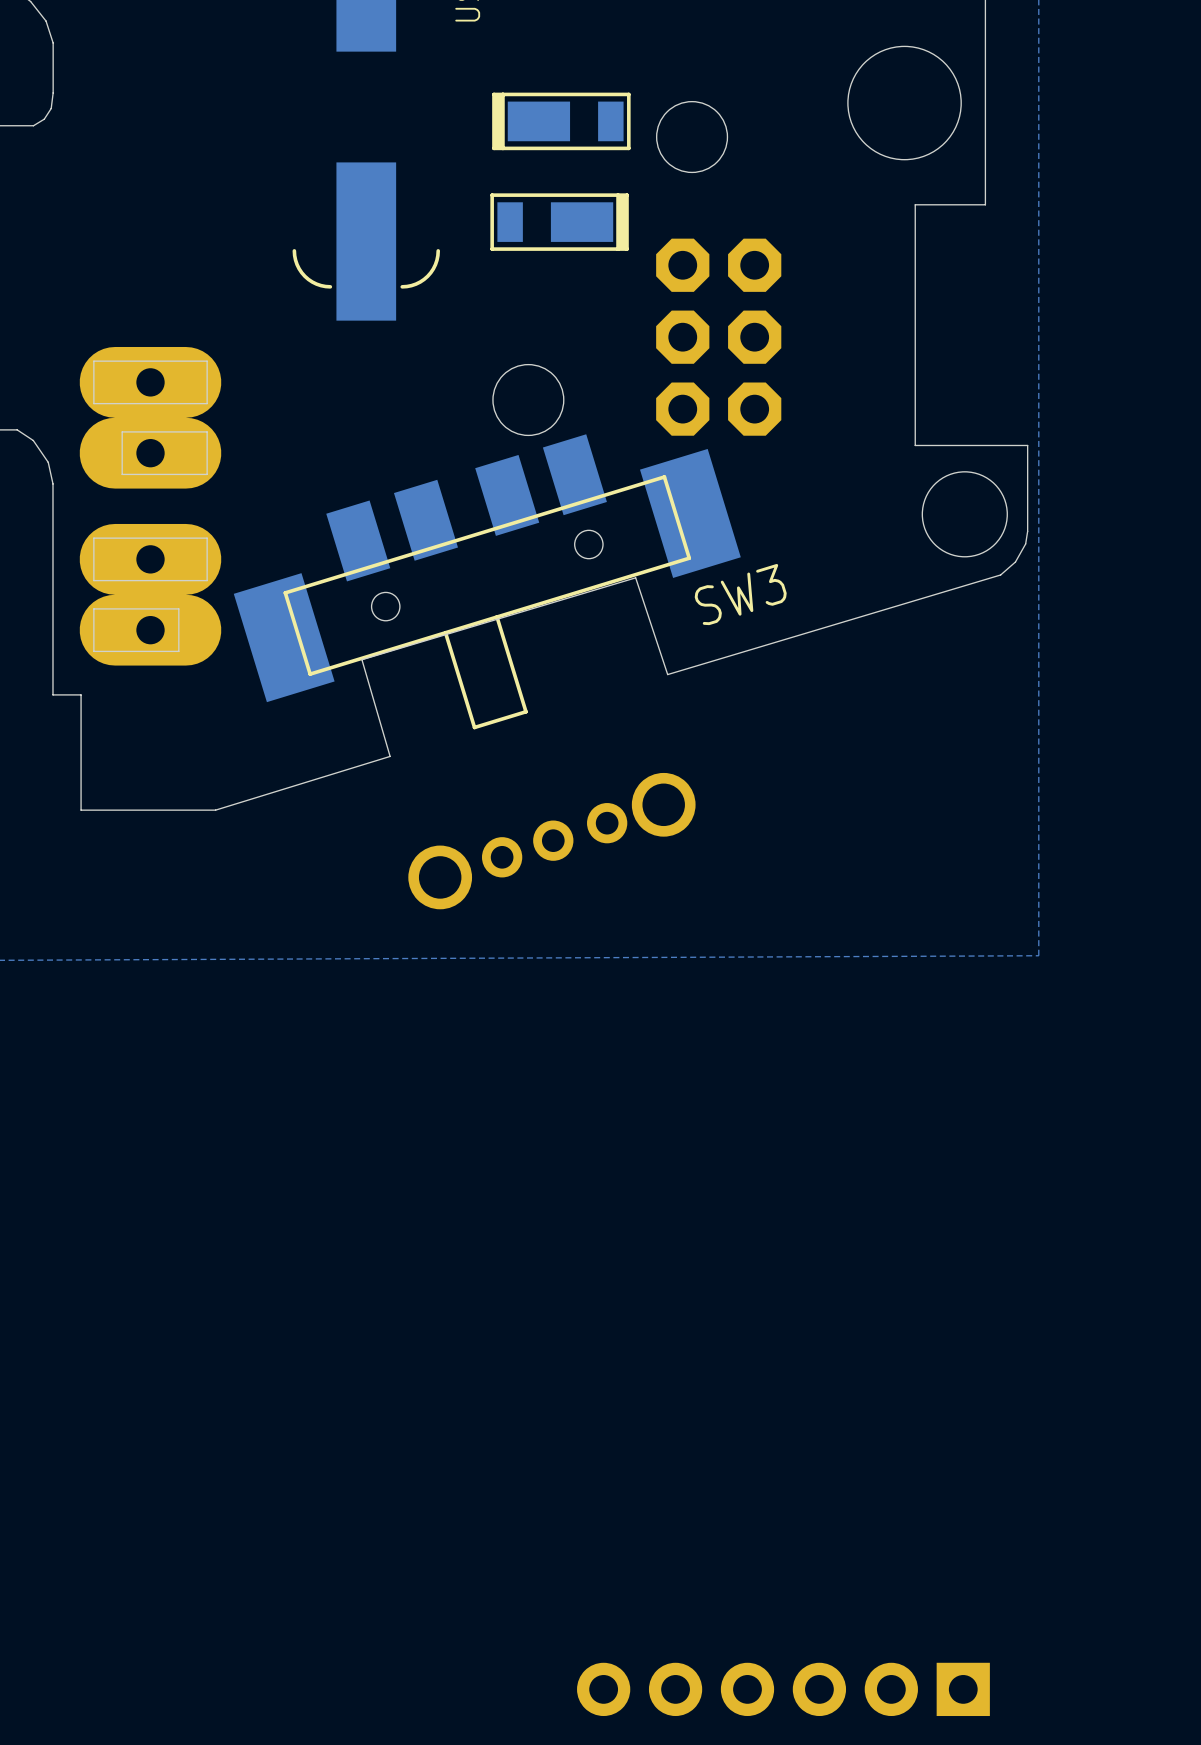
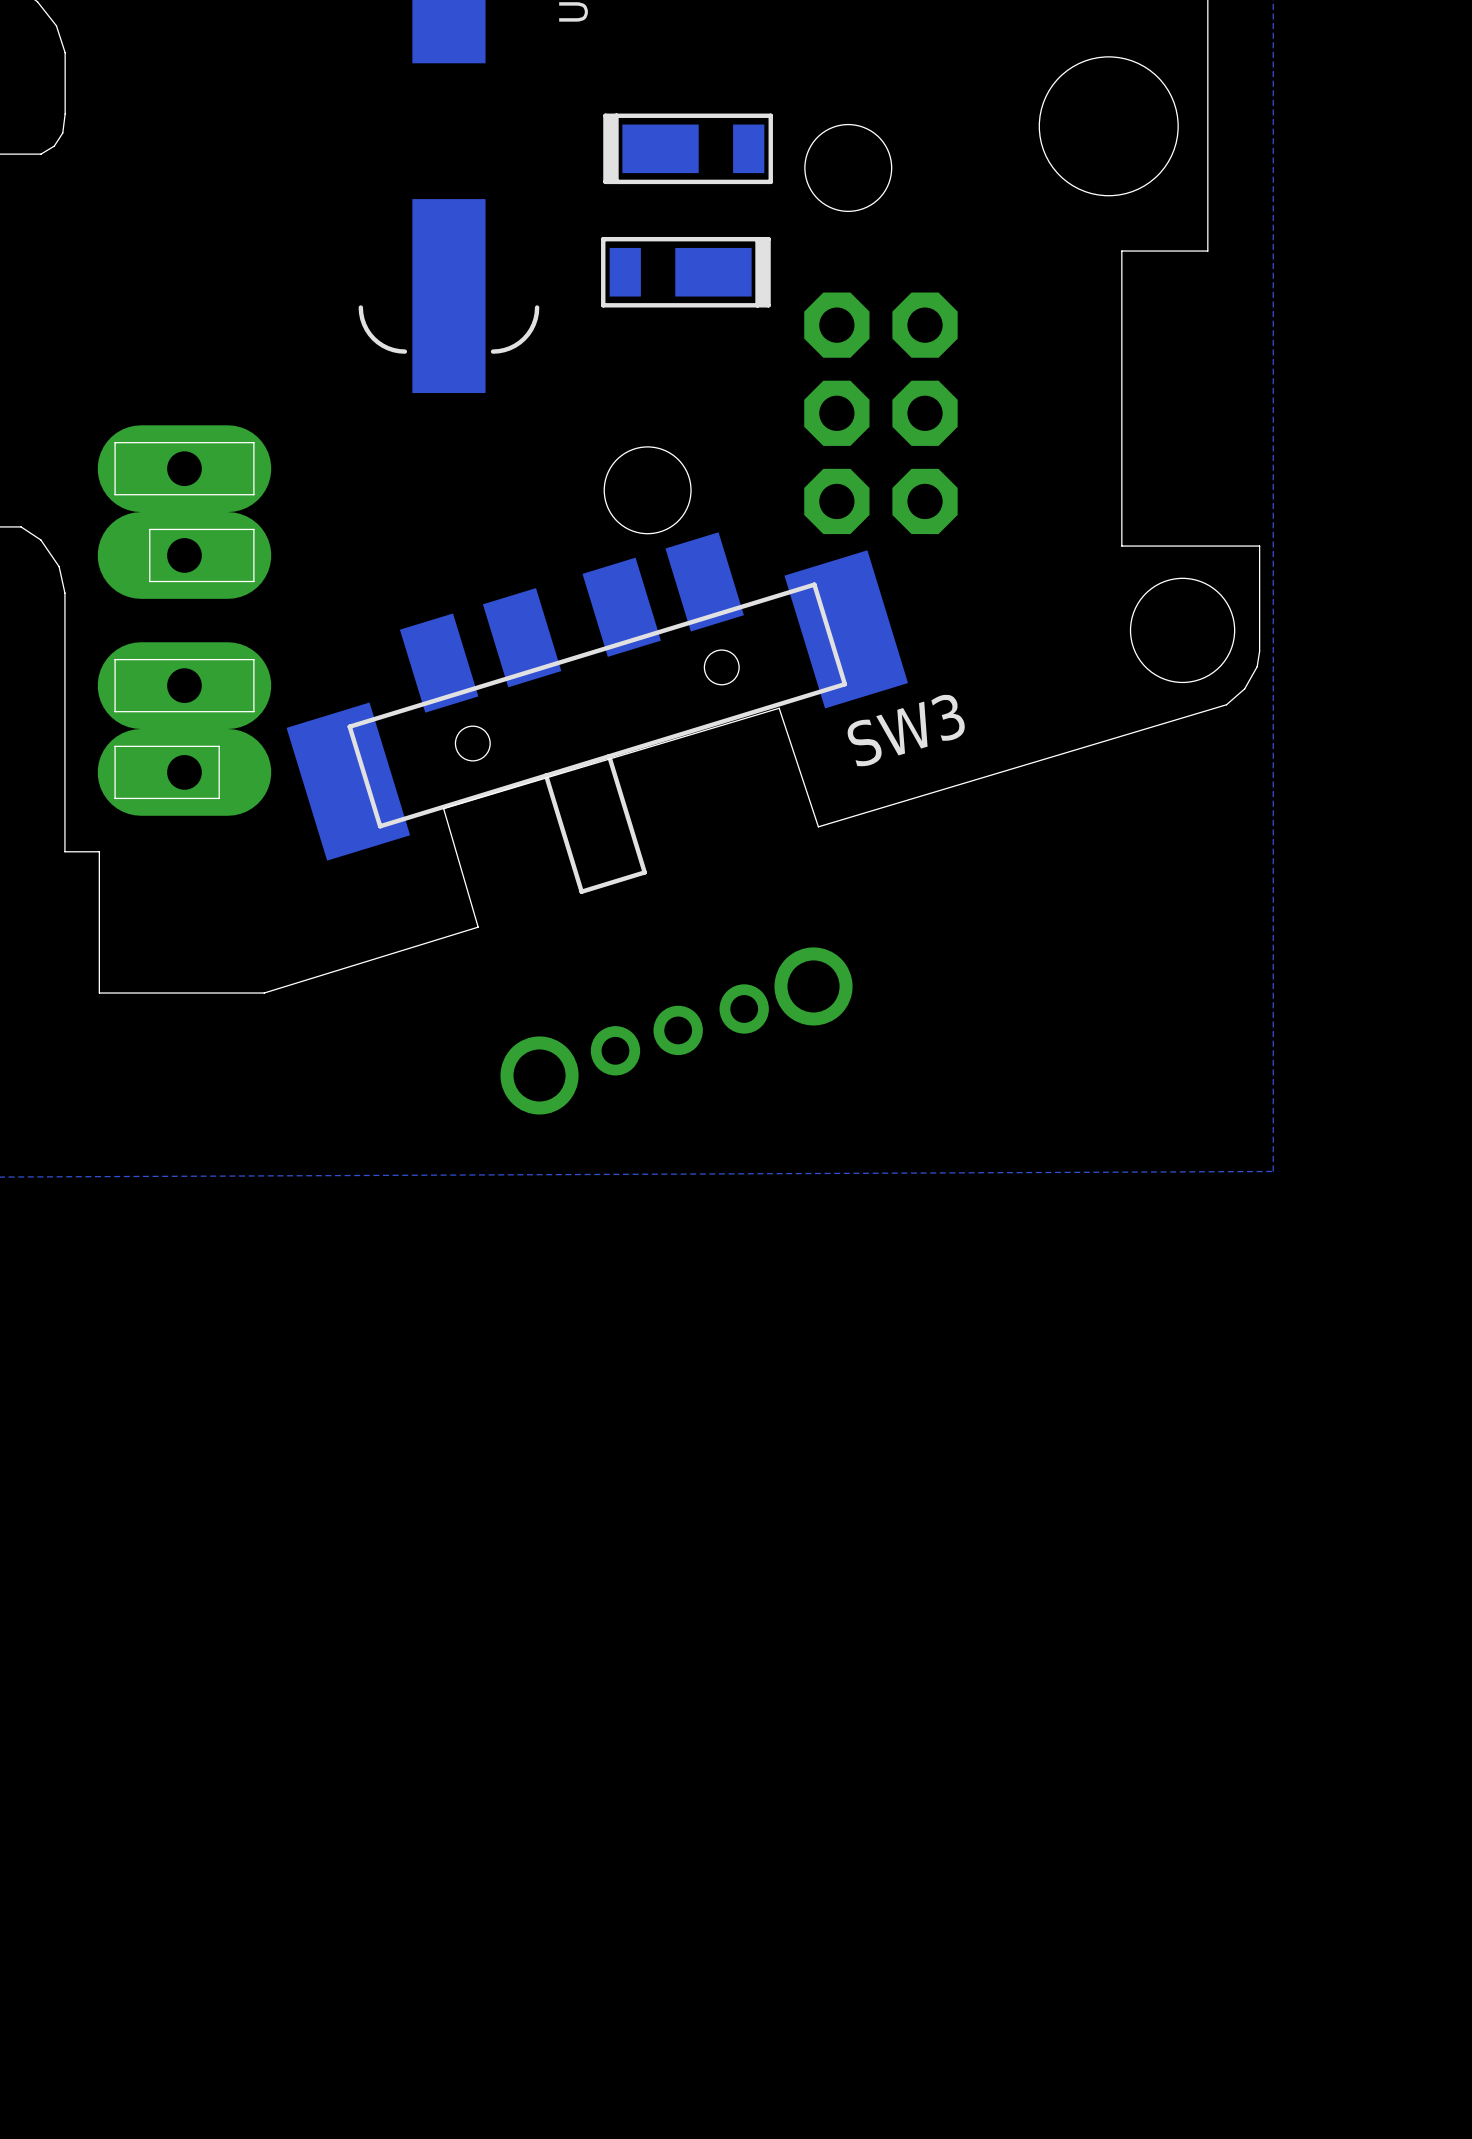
part: (783, 1689) -> none

